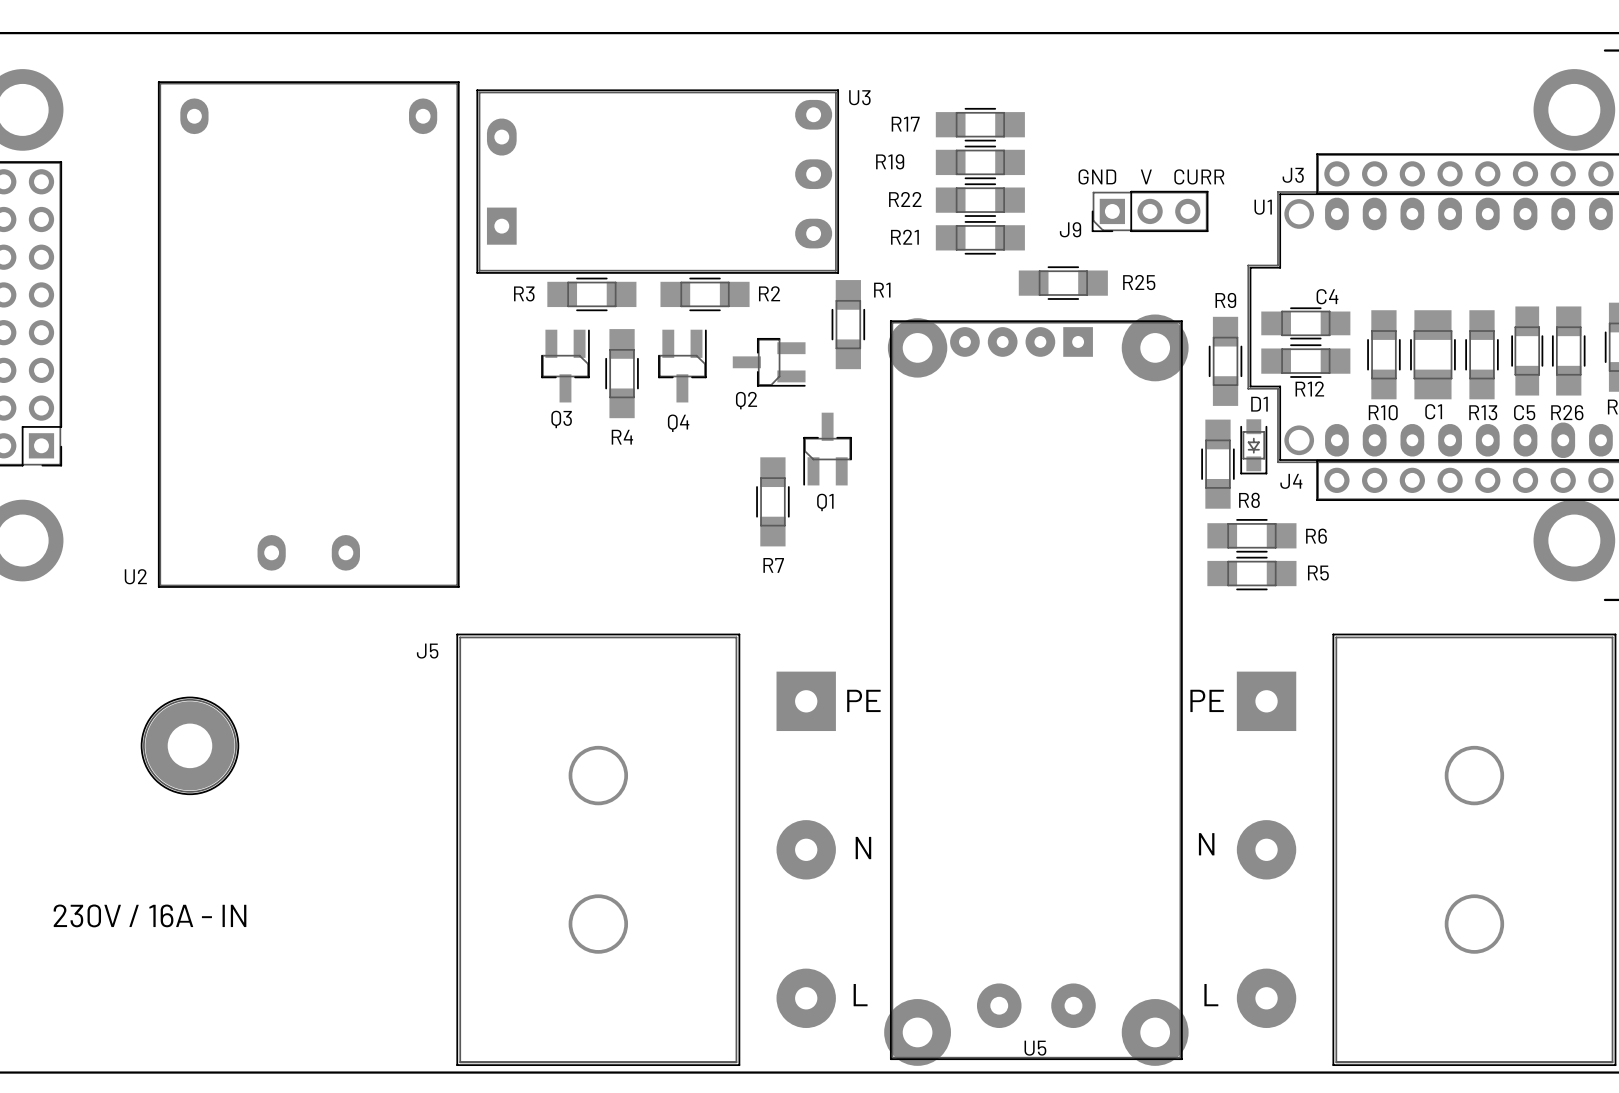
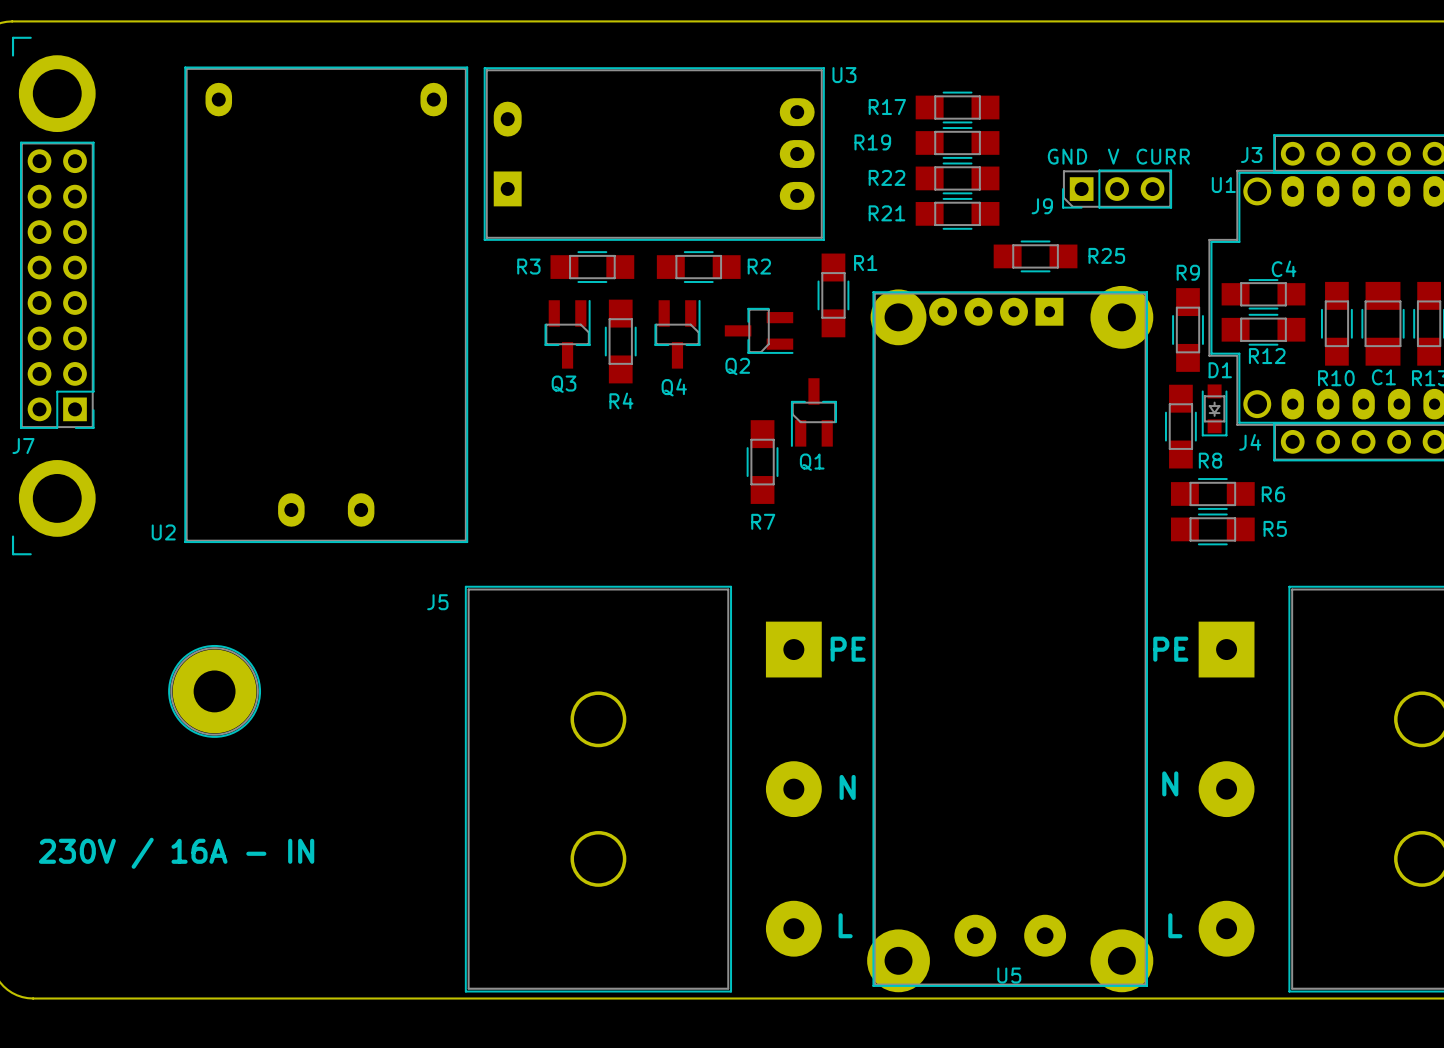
U3 footprint: [476, 89, 840, 274] -> [483, 67, 825, 241]

